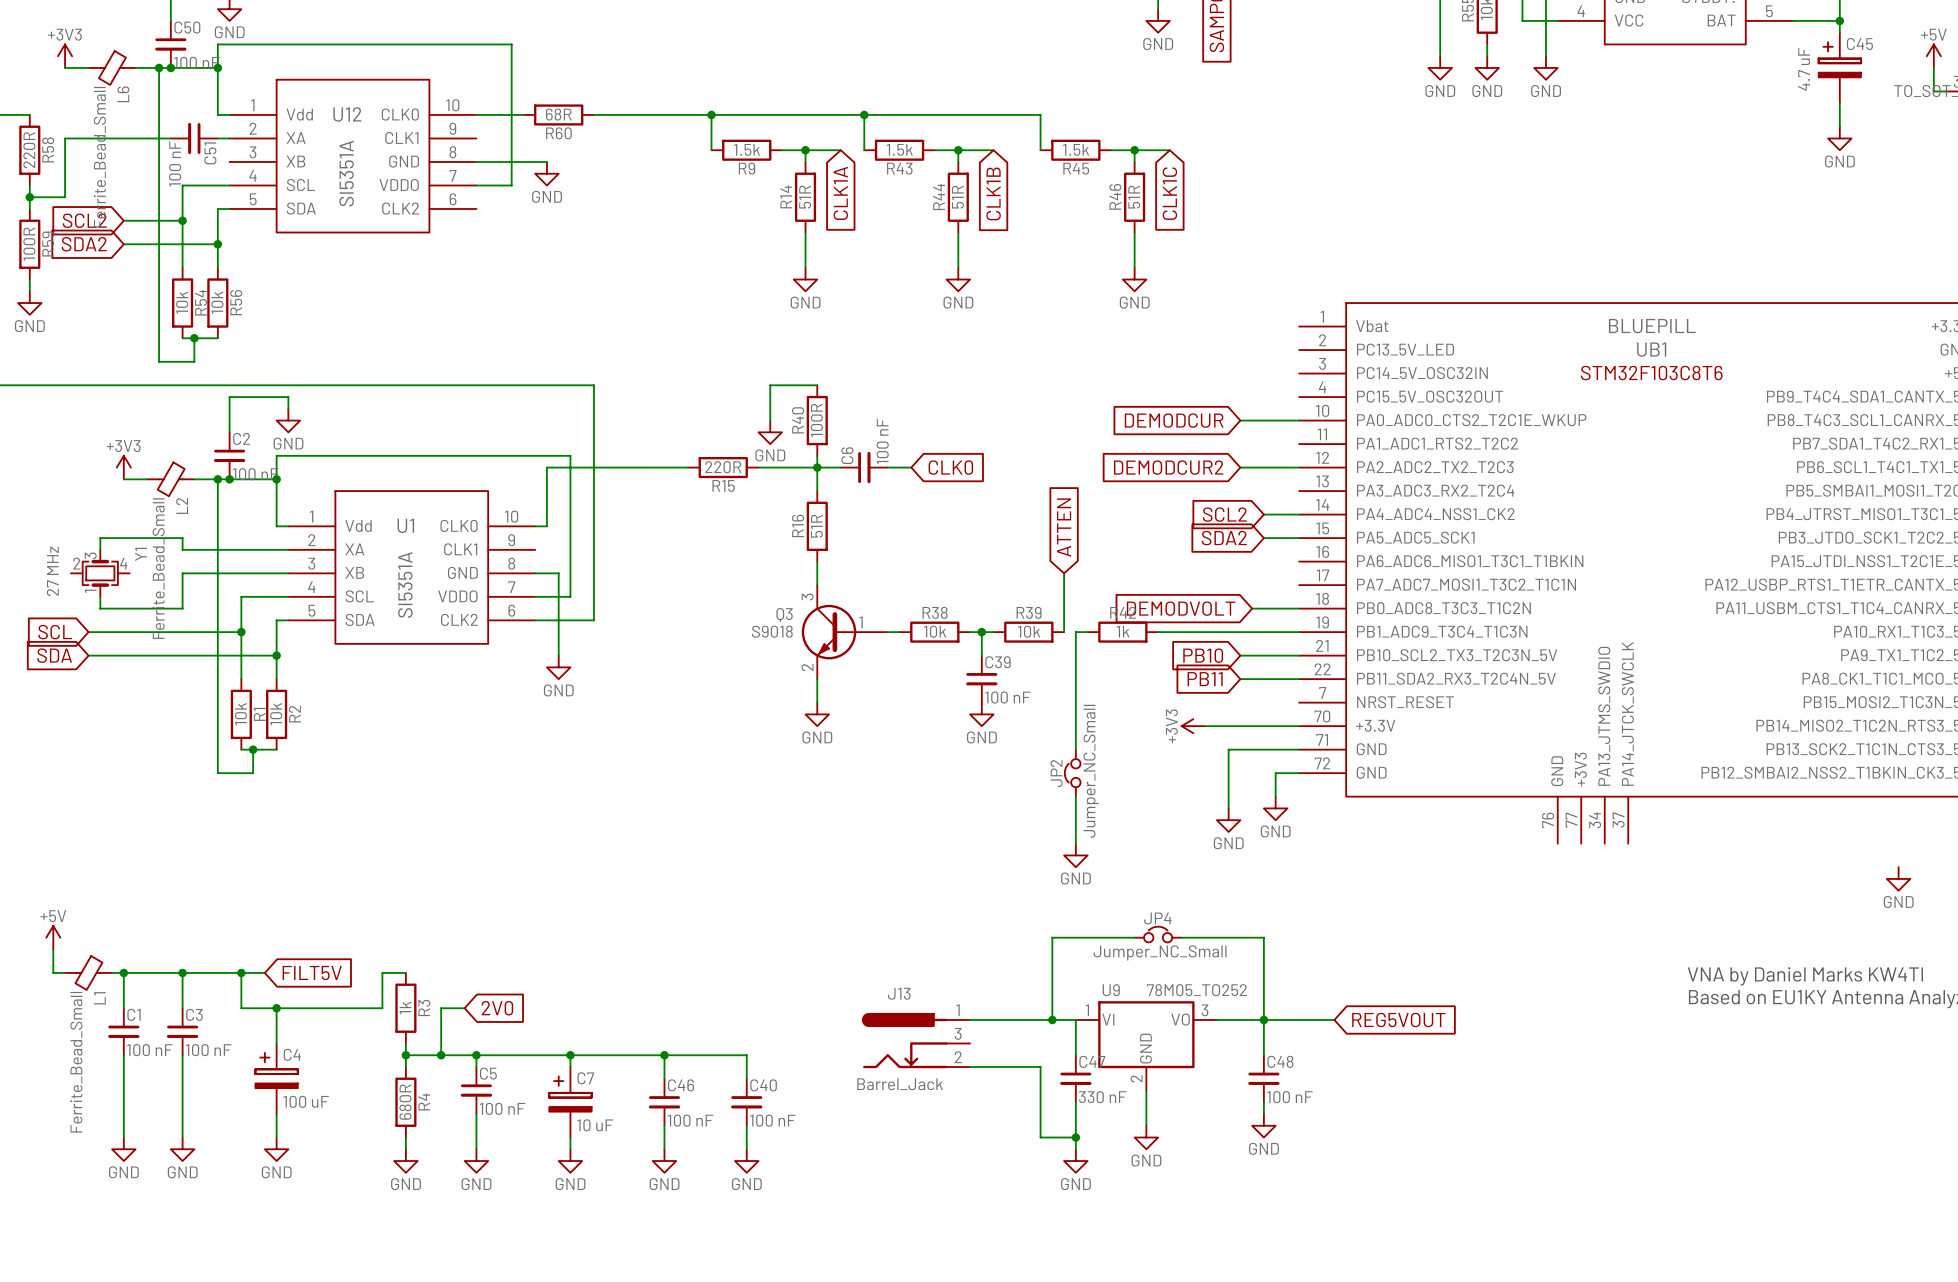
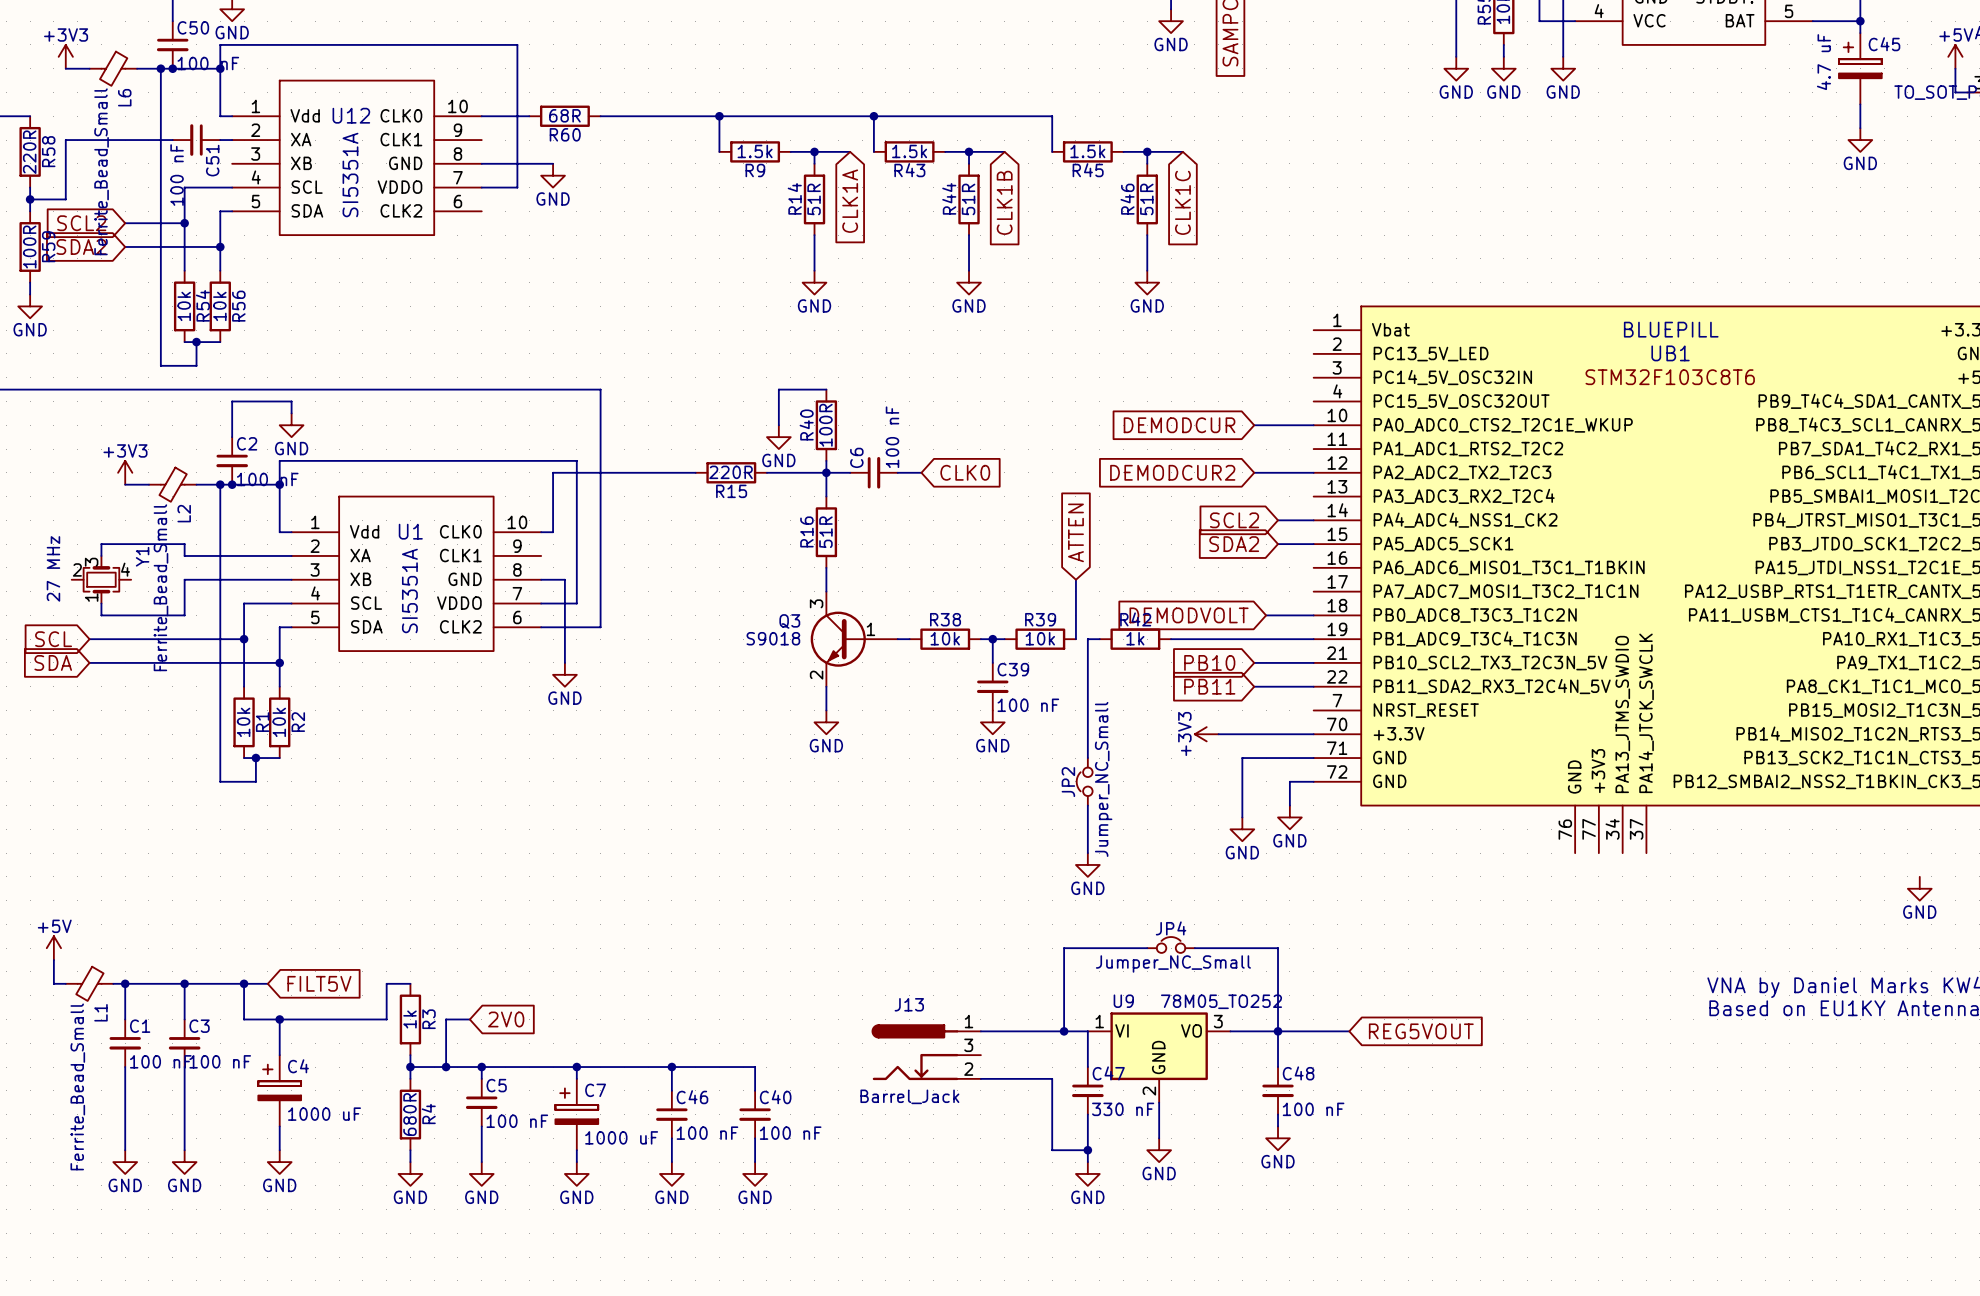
C4 value: 100 uF (306, 1101) -> 1000 uF (324, 1114)
C7 value: 10 uF (595, 1125) -> 1000 uF (621, 1137)

